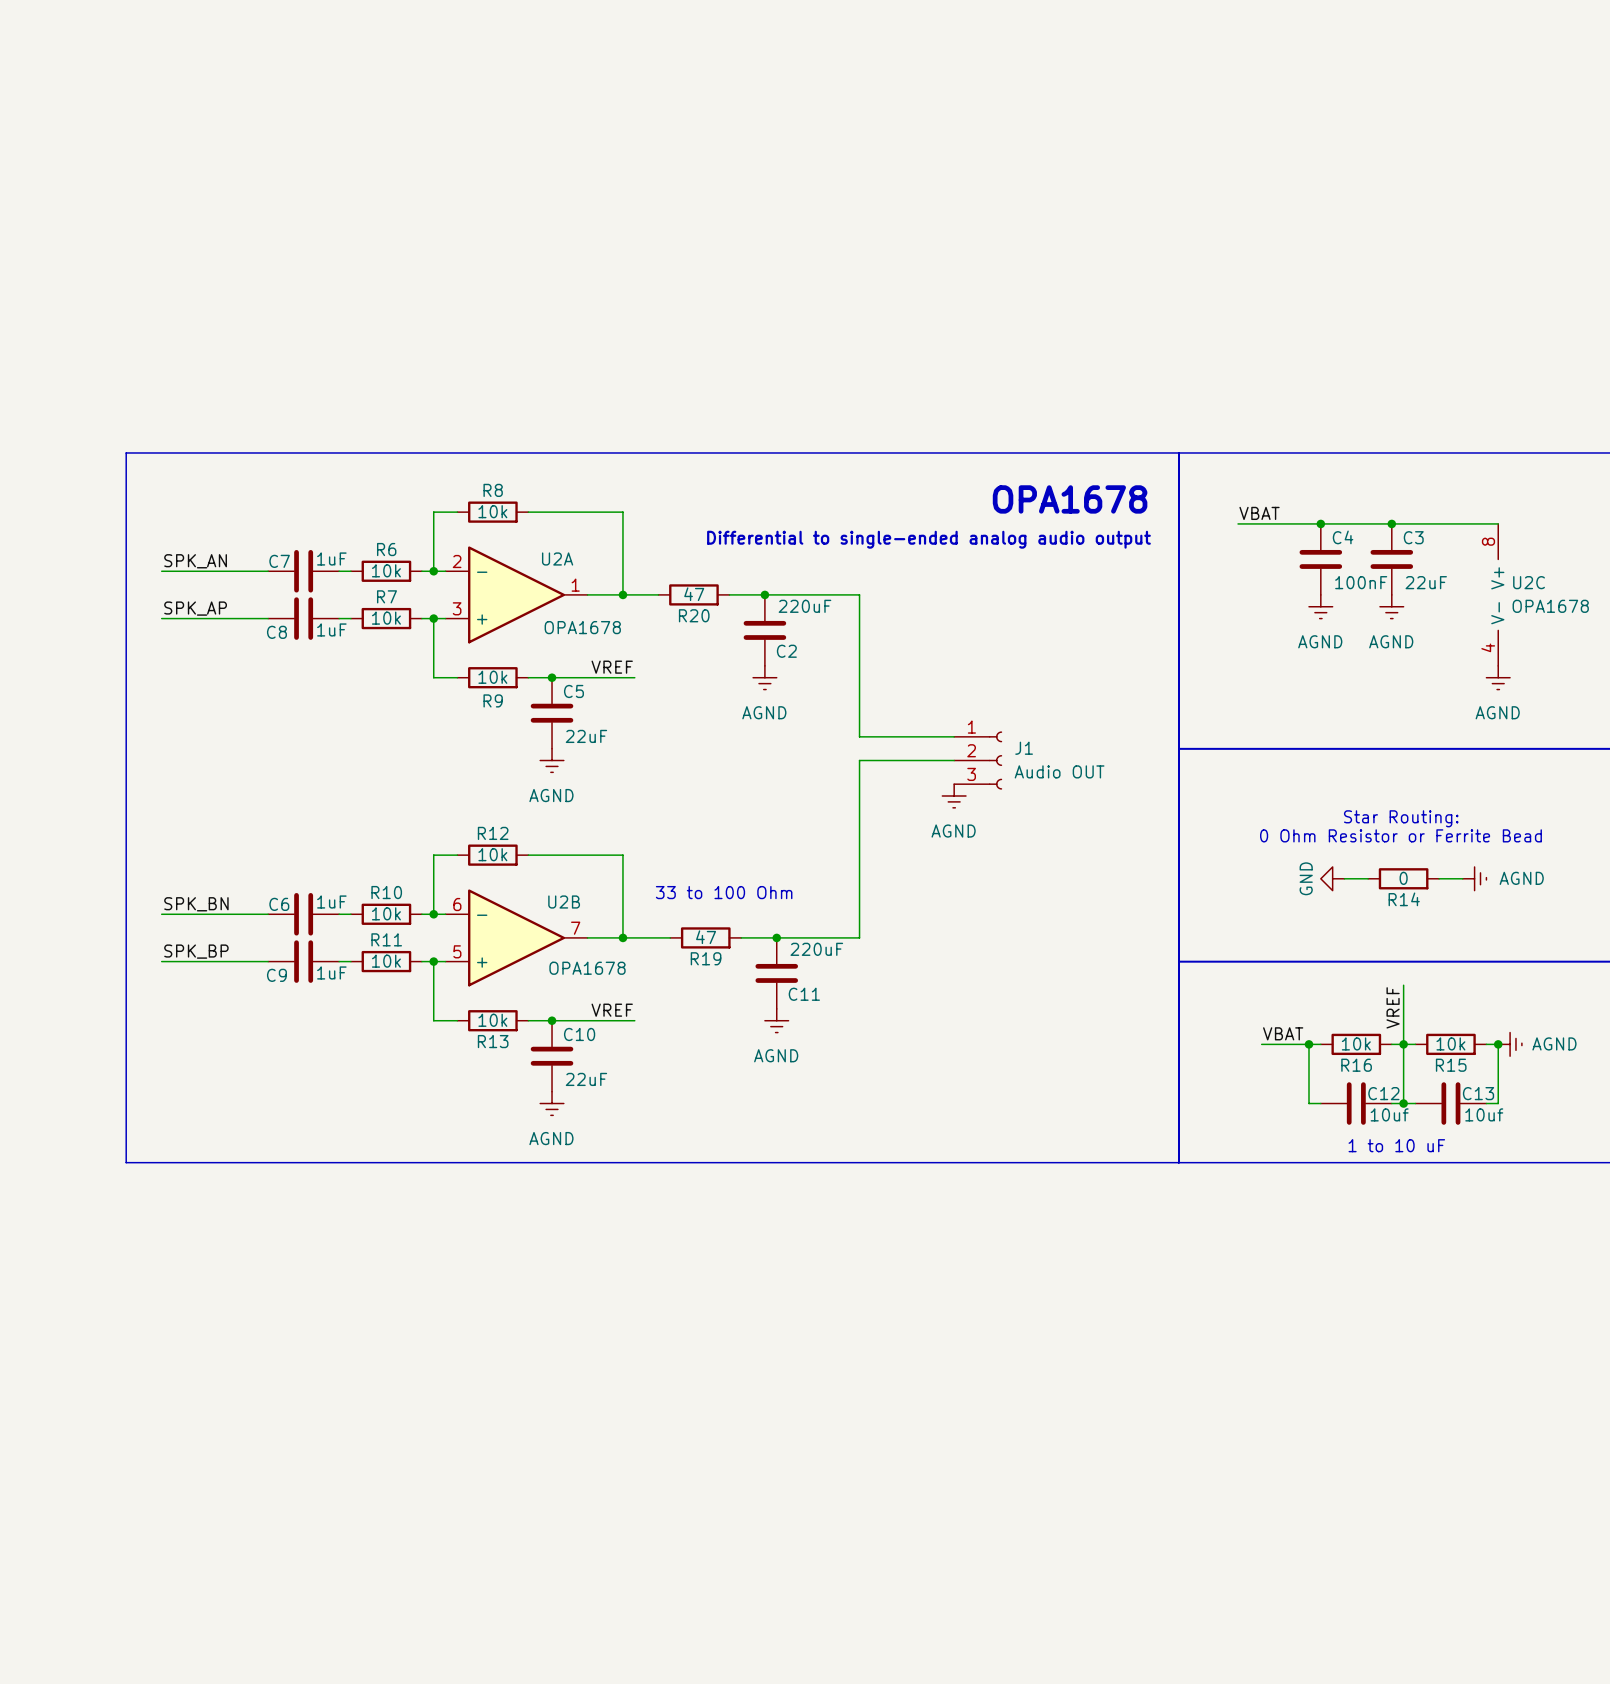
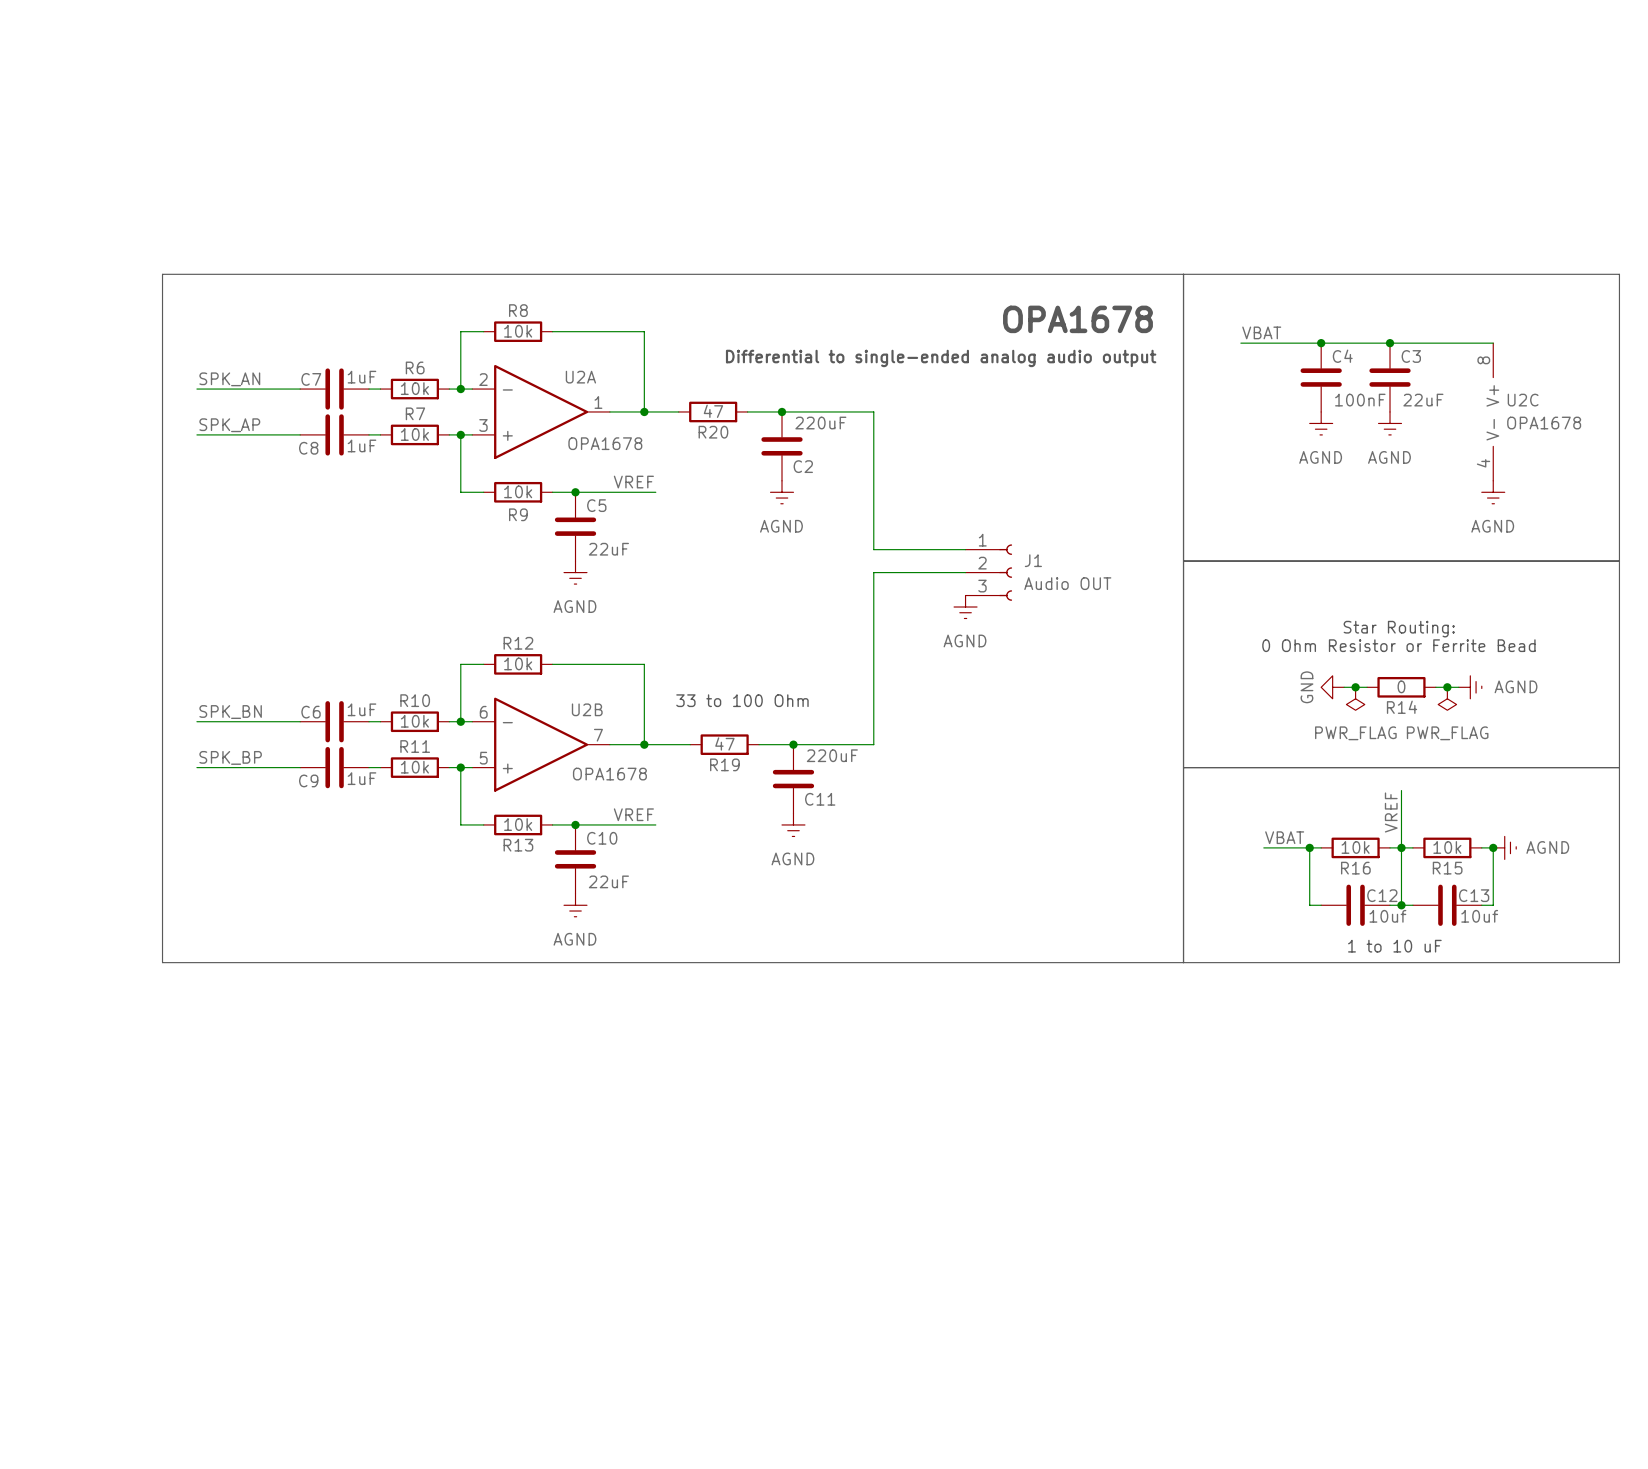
junction: none -> (1355, 687)
junction: none -> (1447, 687)
power symbol: none -> PWR_FLAG (1355, 698)
power symbol: none -> PWR_FLAG (1447, 698)

